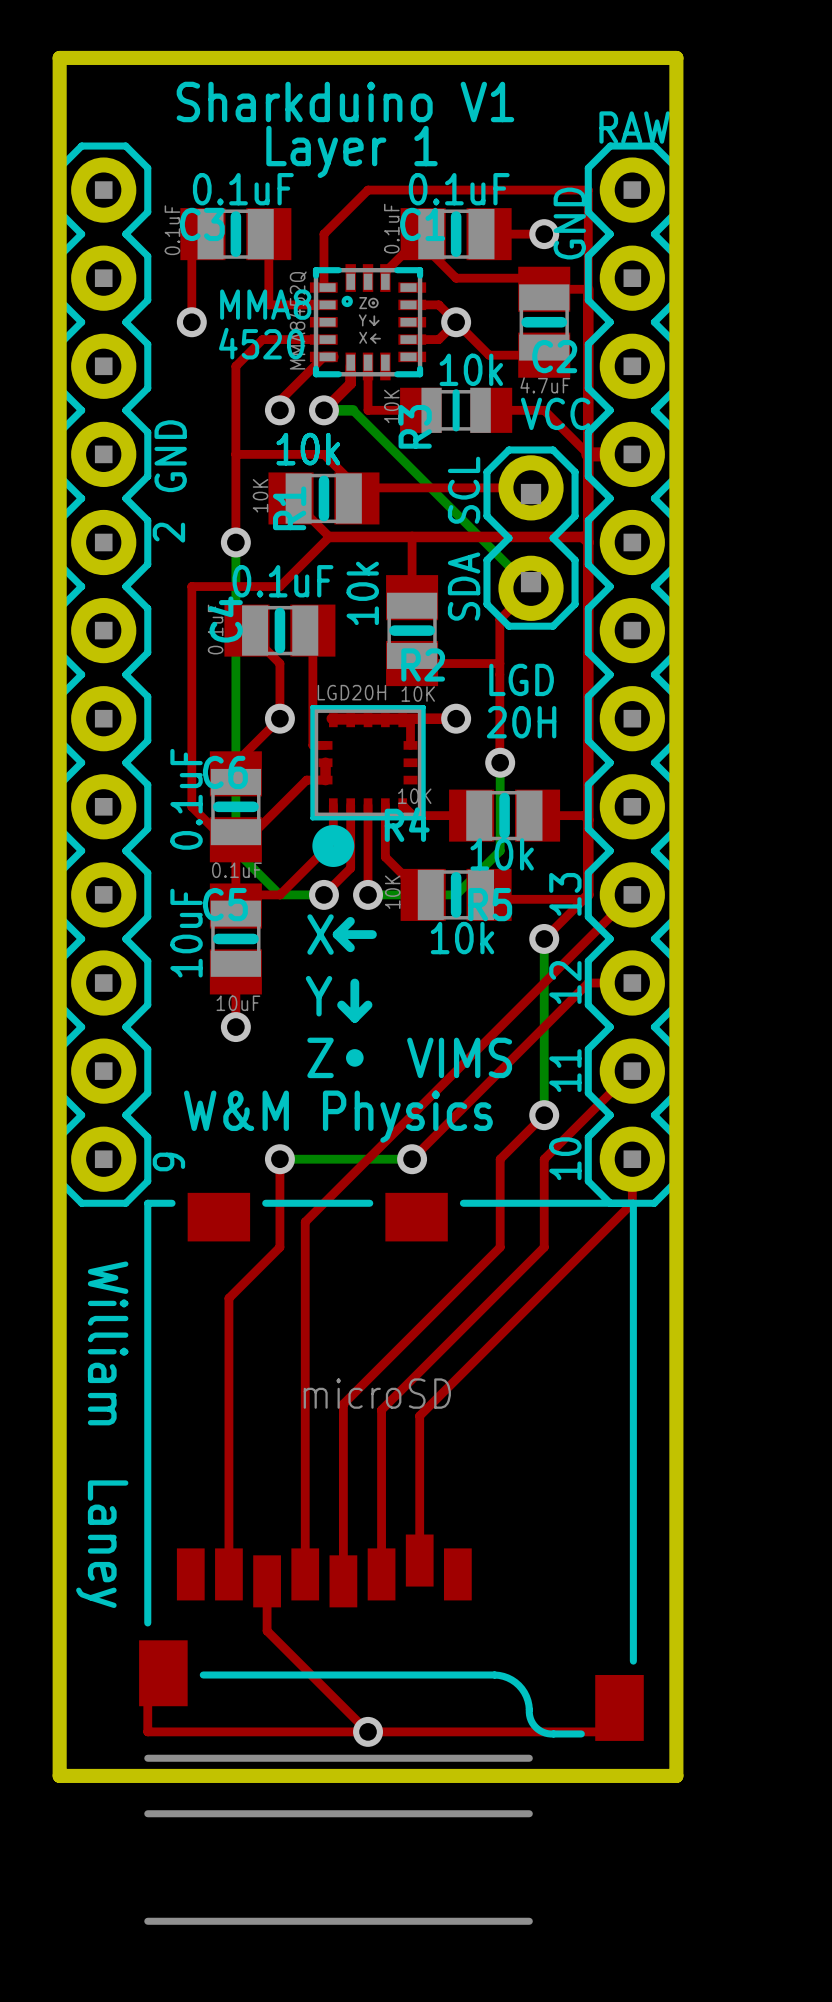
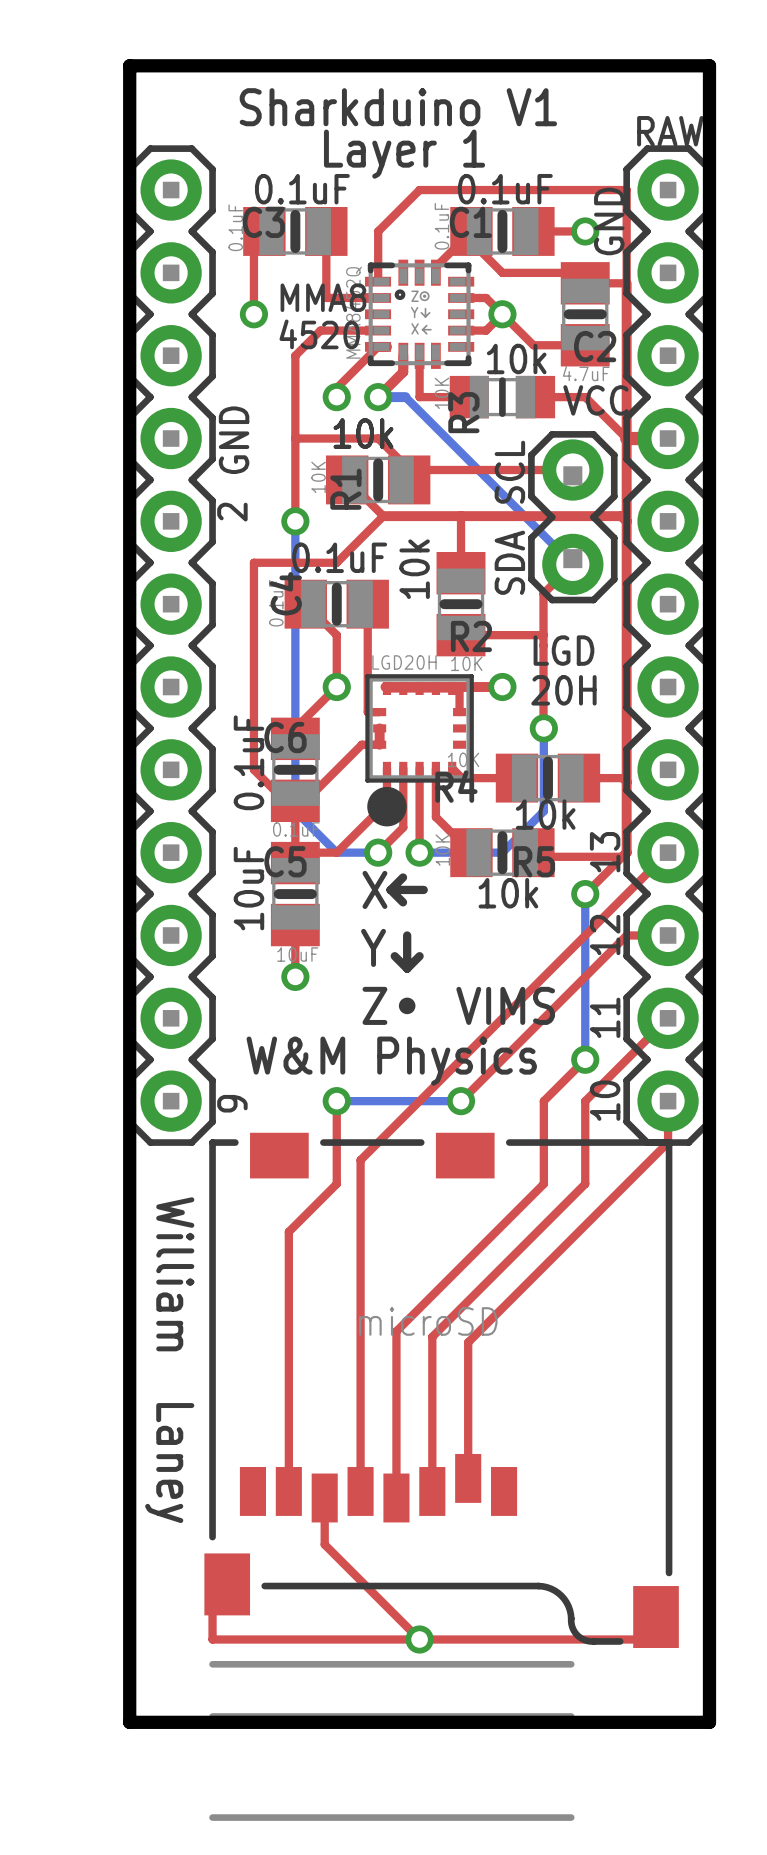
board edge: (59, 1775) (676, 1775) -> (129, 1680) (129, 1722) (709, 1722) (709, 1680)

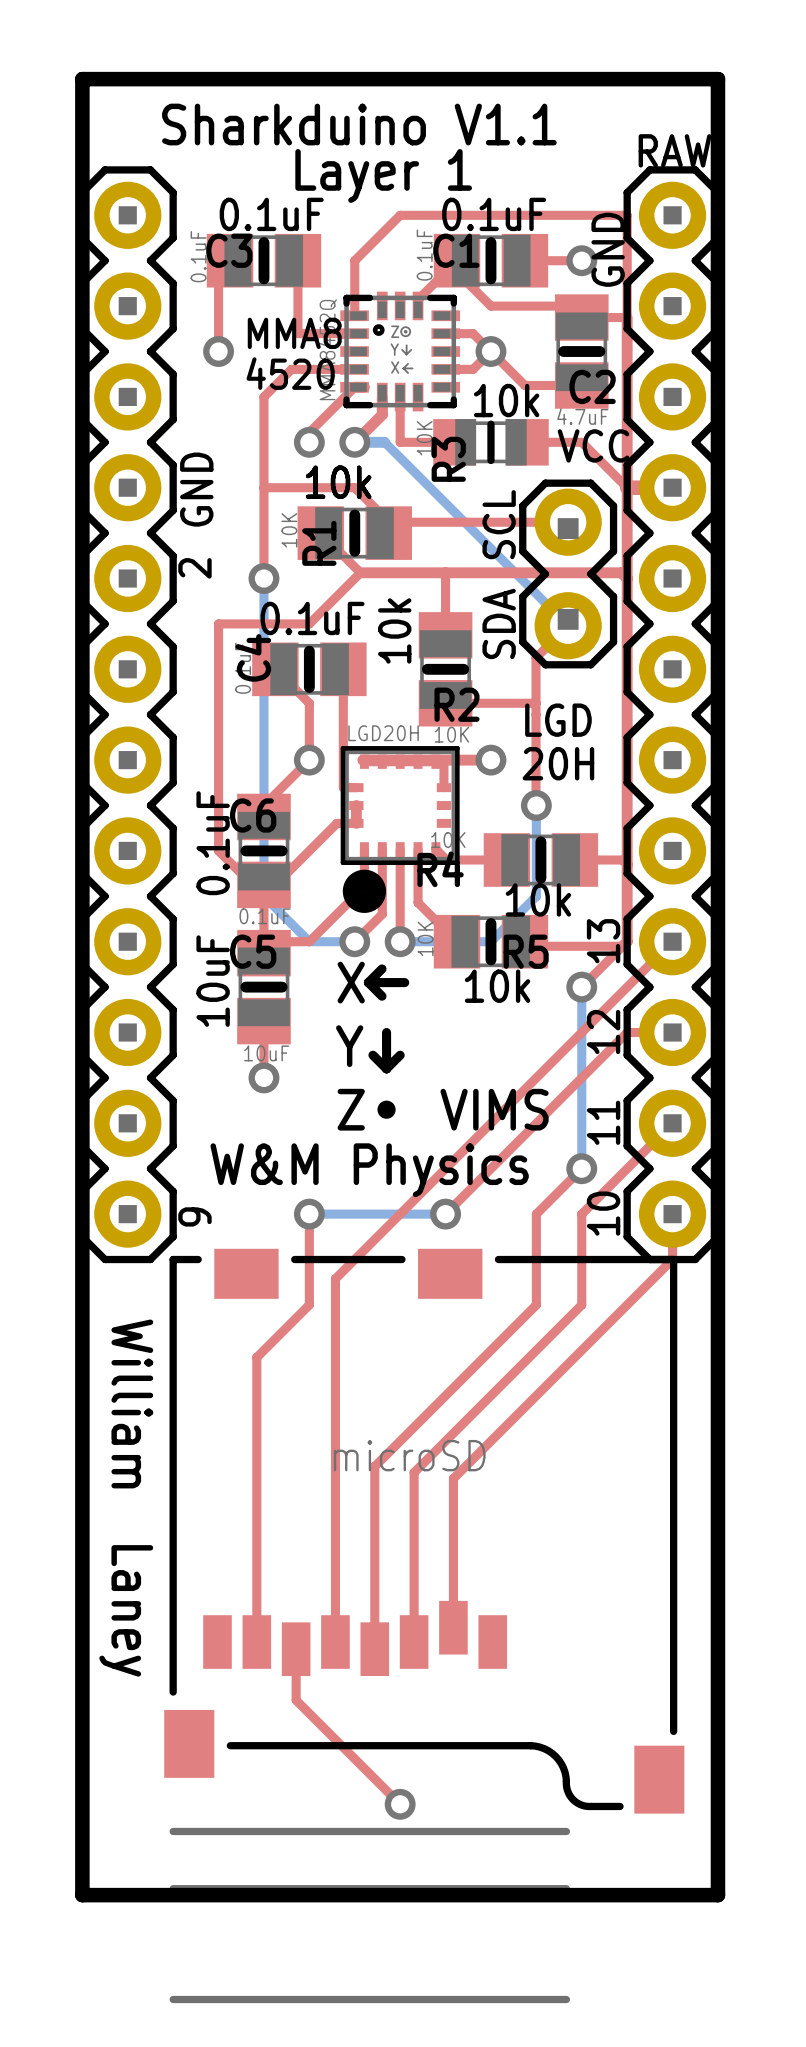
text: Sharkduino V1 (398, 107) -> Sharkduino V1.1 (359, 124)
top track: (212, 1584) (212, 1639) (656, 1639) -> none

